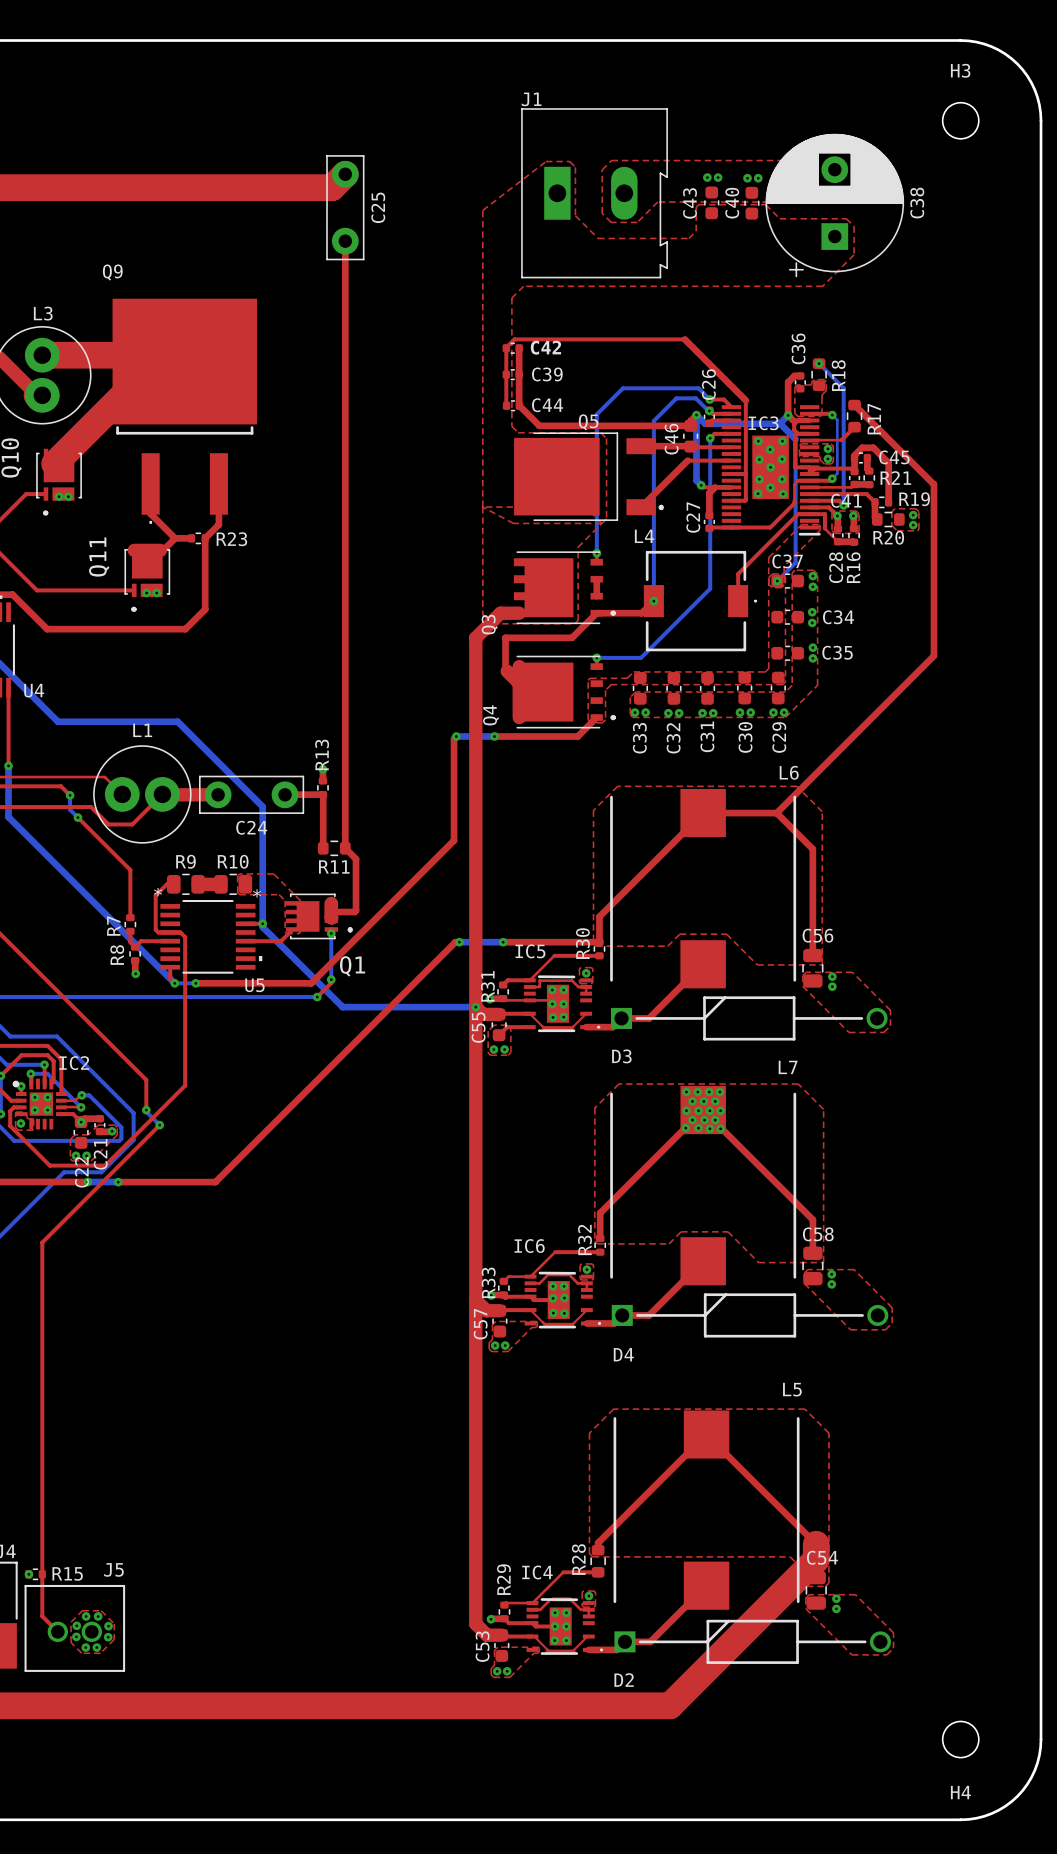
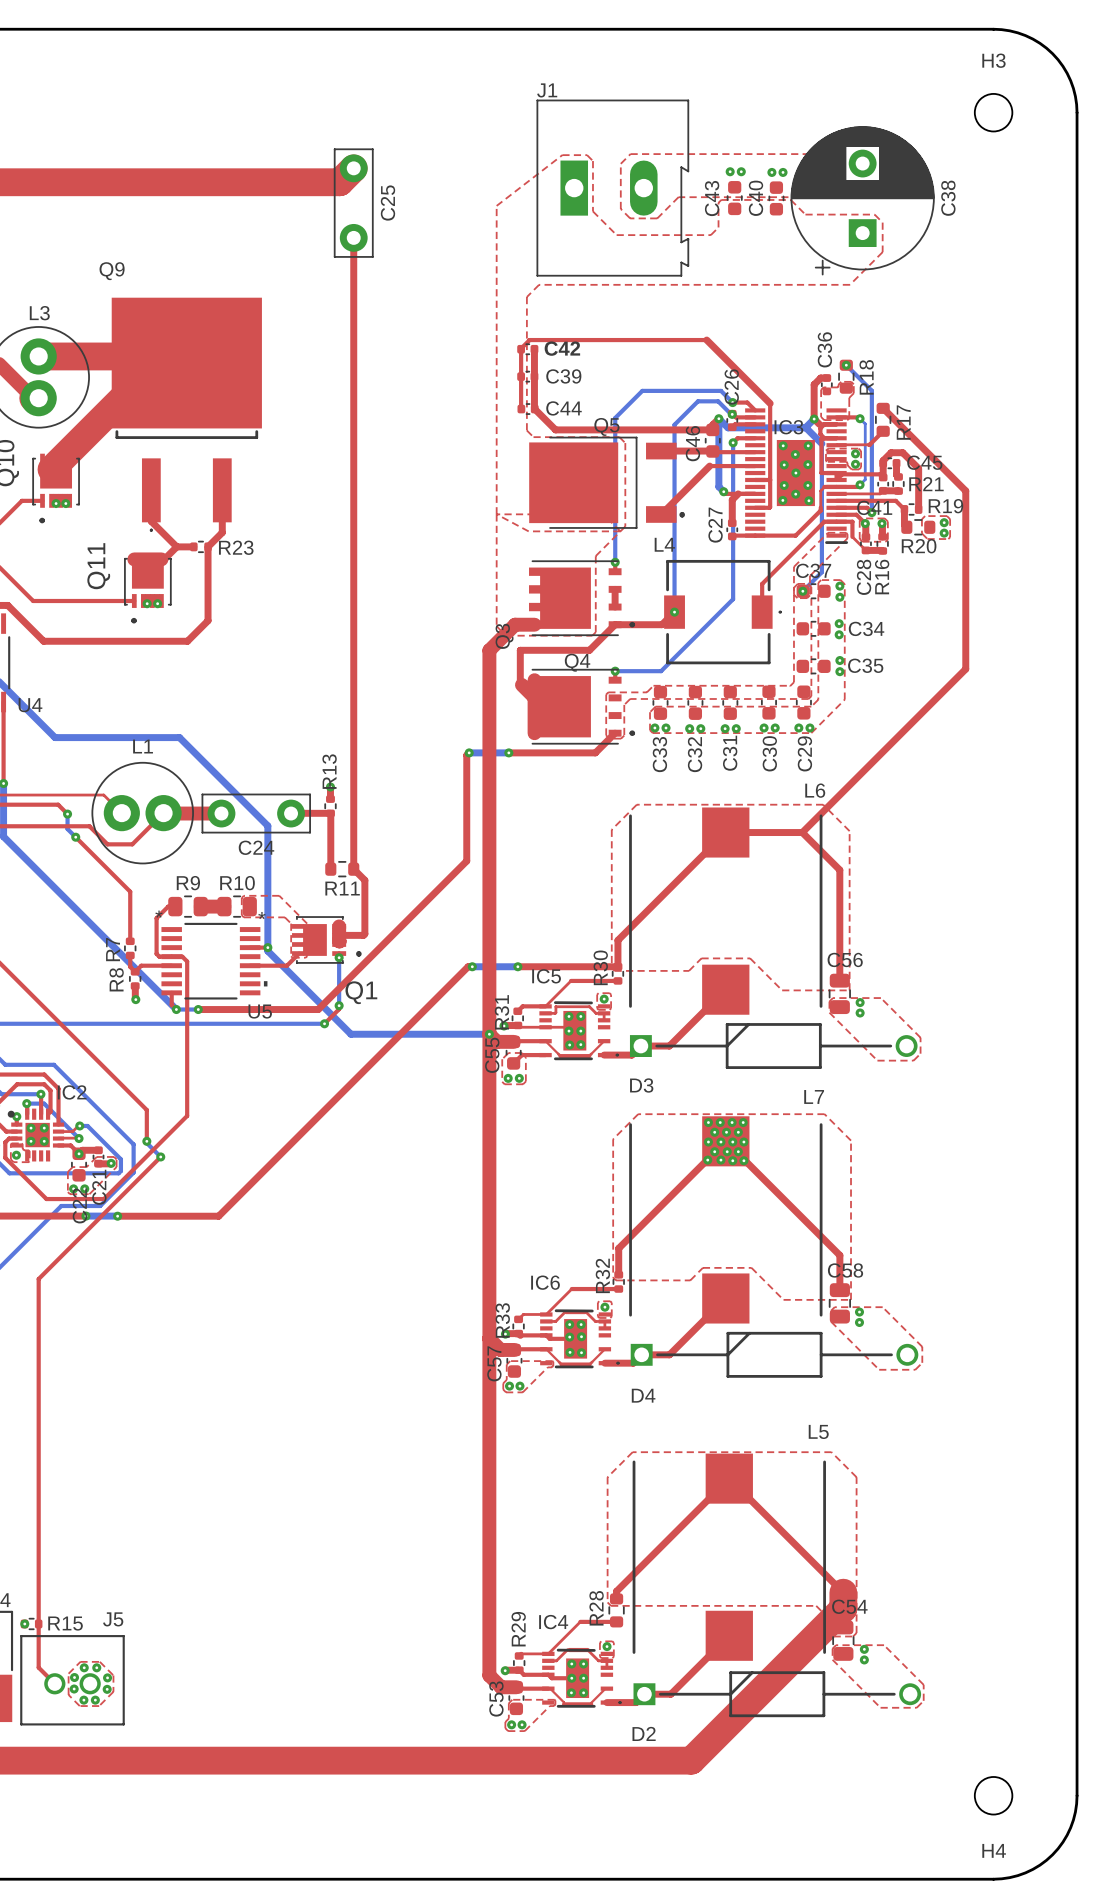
Q4 name rotation: 0° (491, 715) -> 90° clockwise (577, 662)
Q4 name position: Q4 (491, 715) -> Q4 (577, 662)

